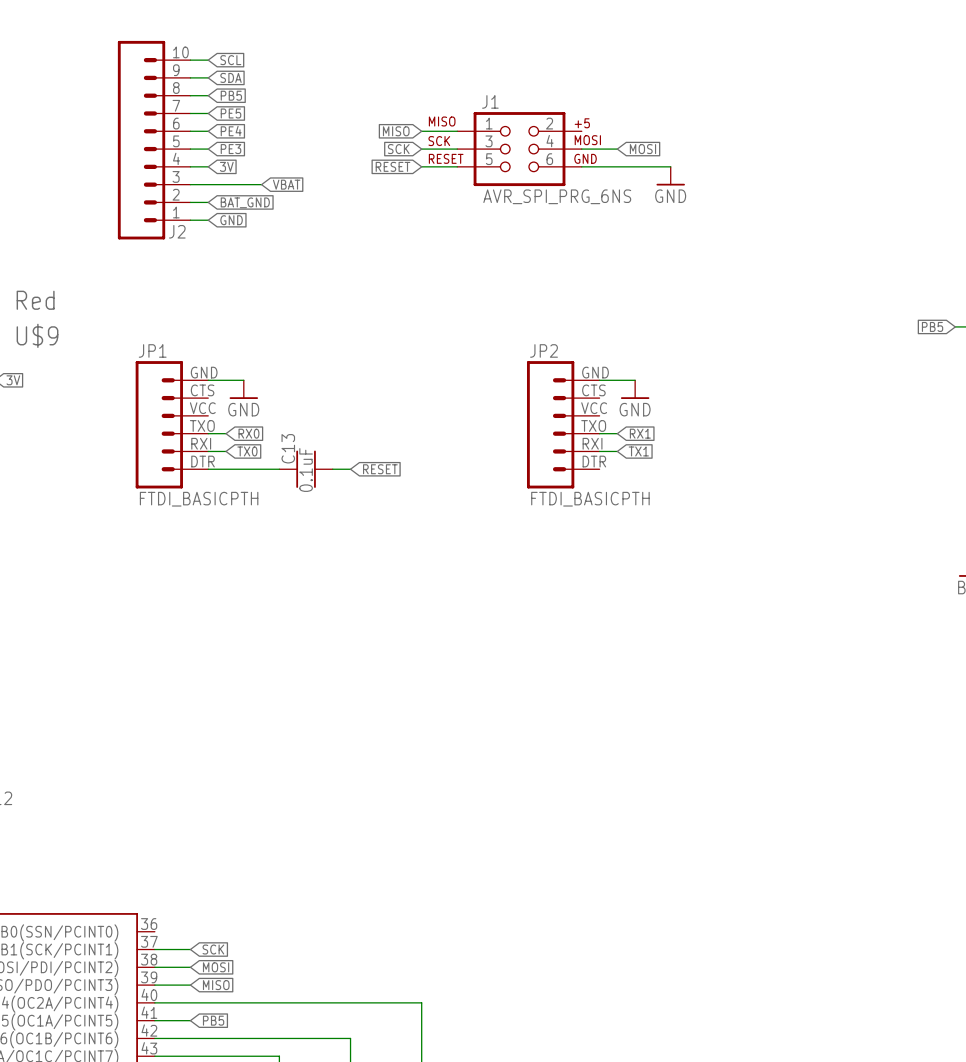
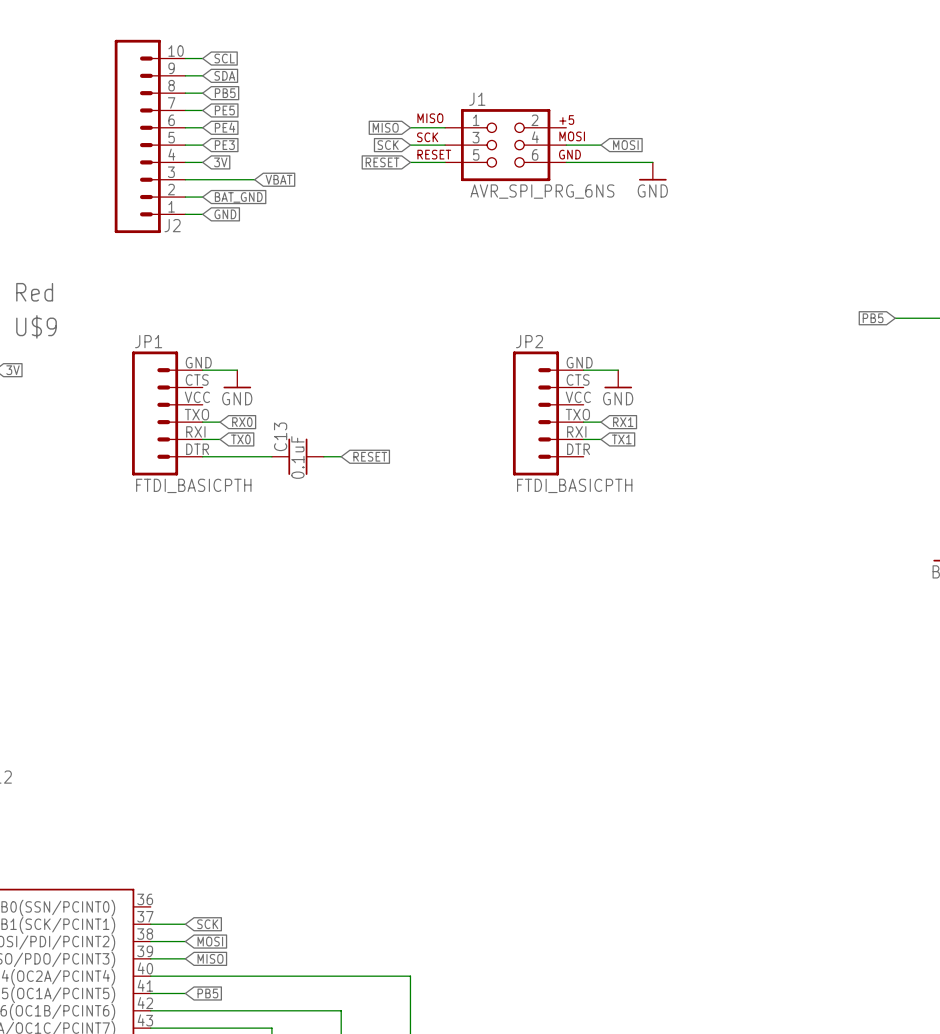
wire: none -> (895, 318) (929, 318)
global label position: PB5 (932, 326) -> PB5 (873, 318)

